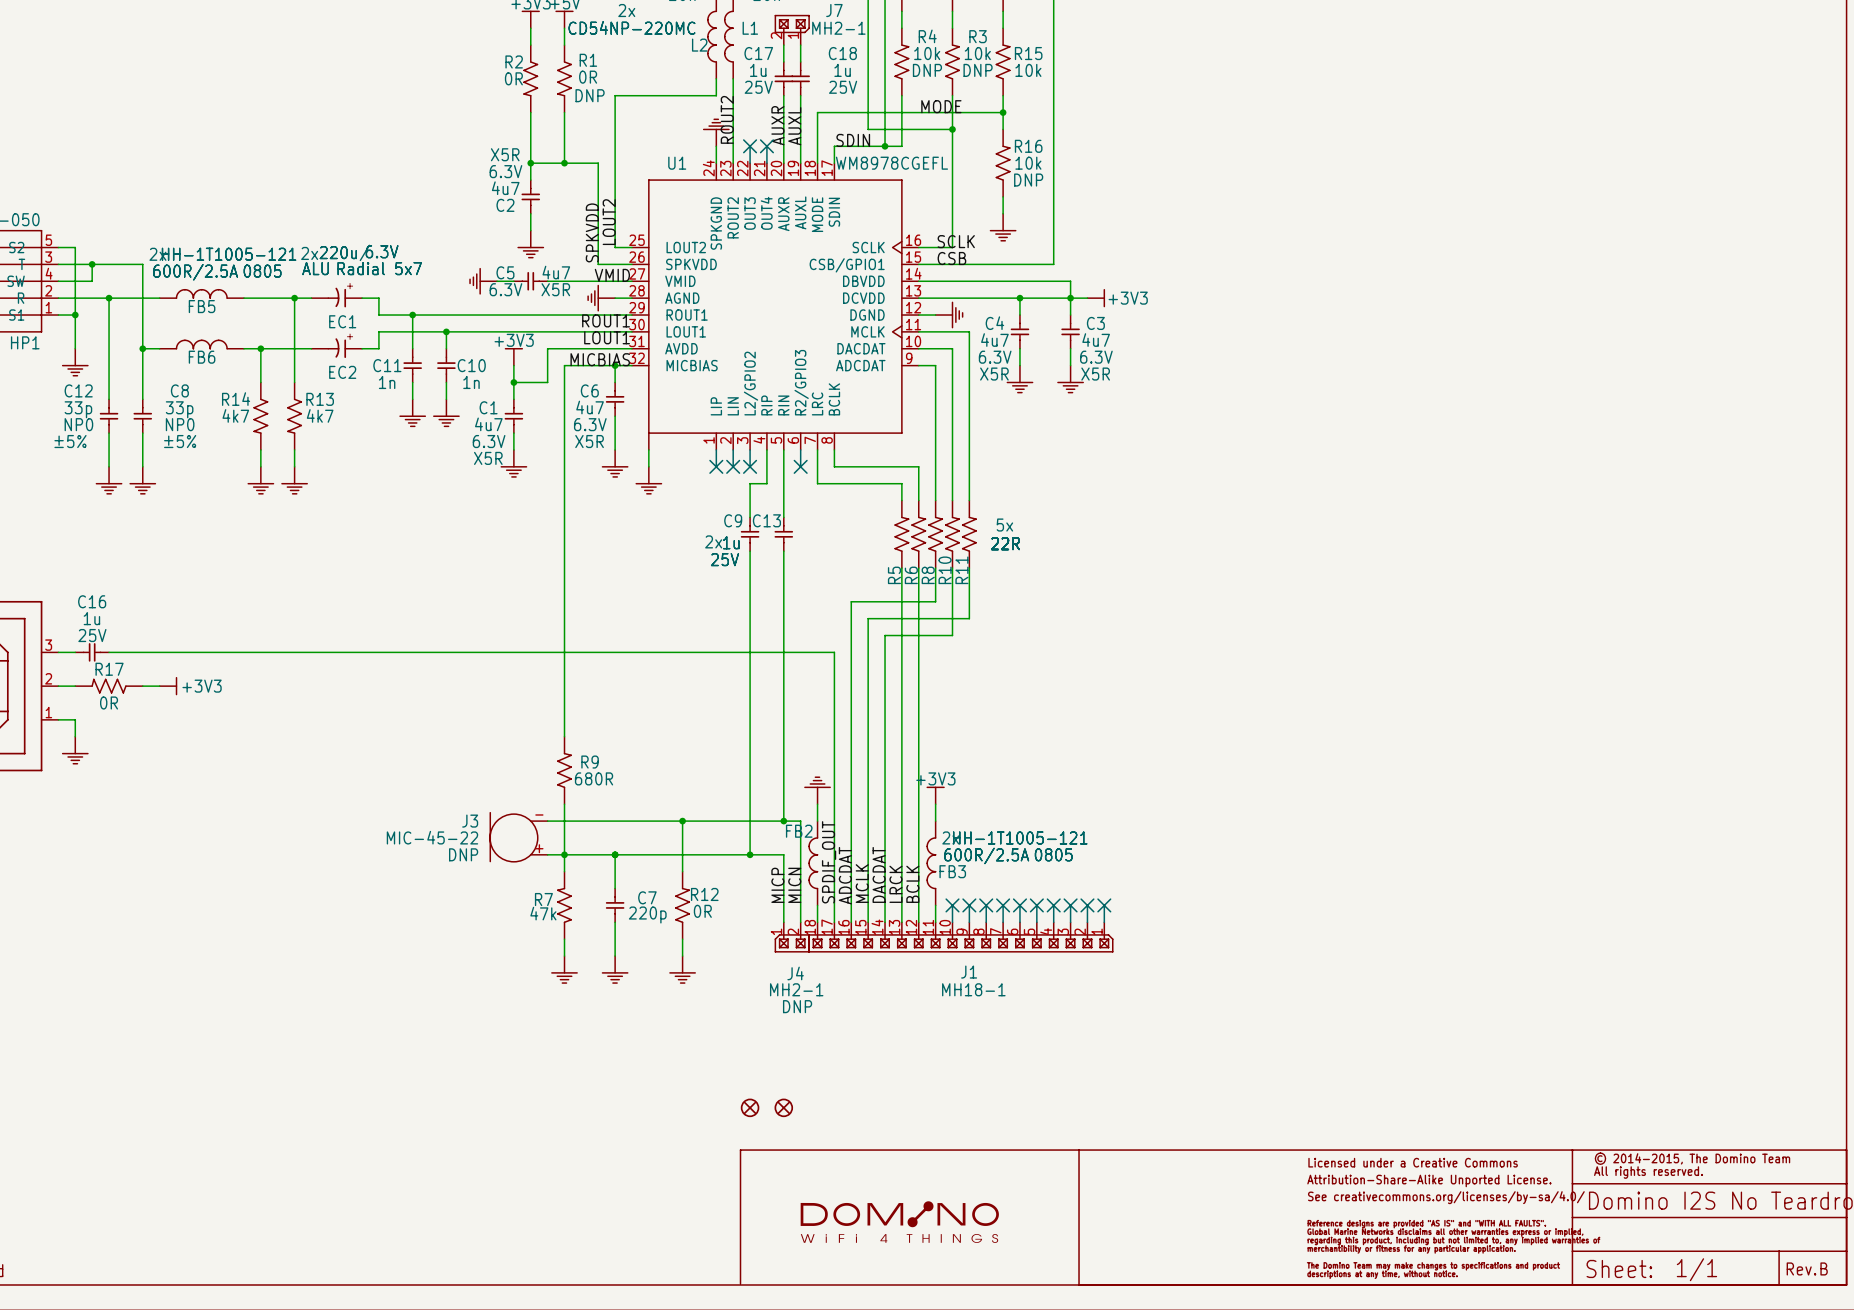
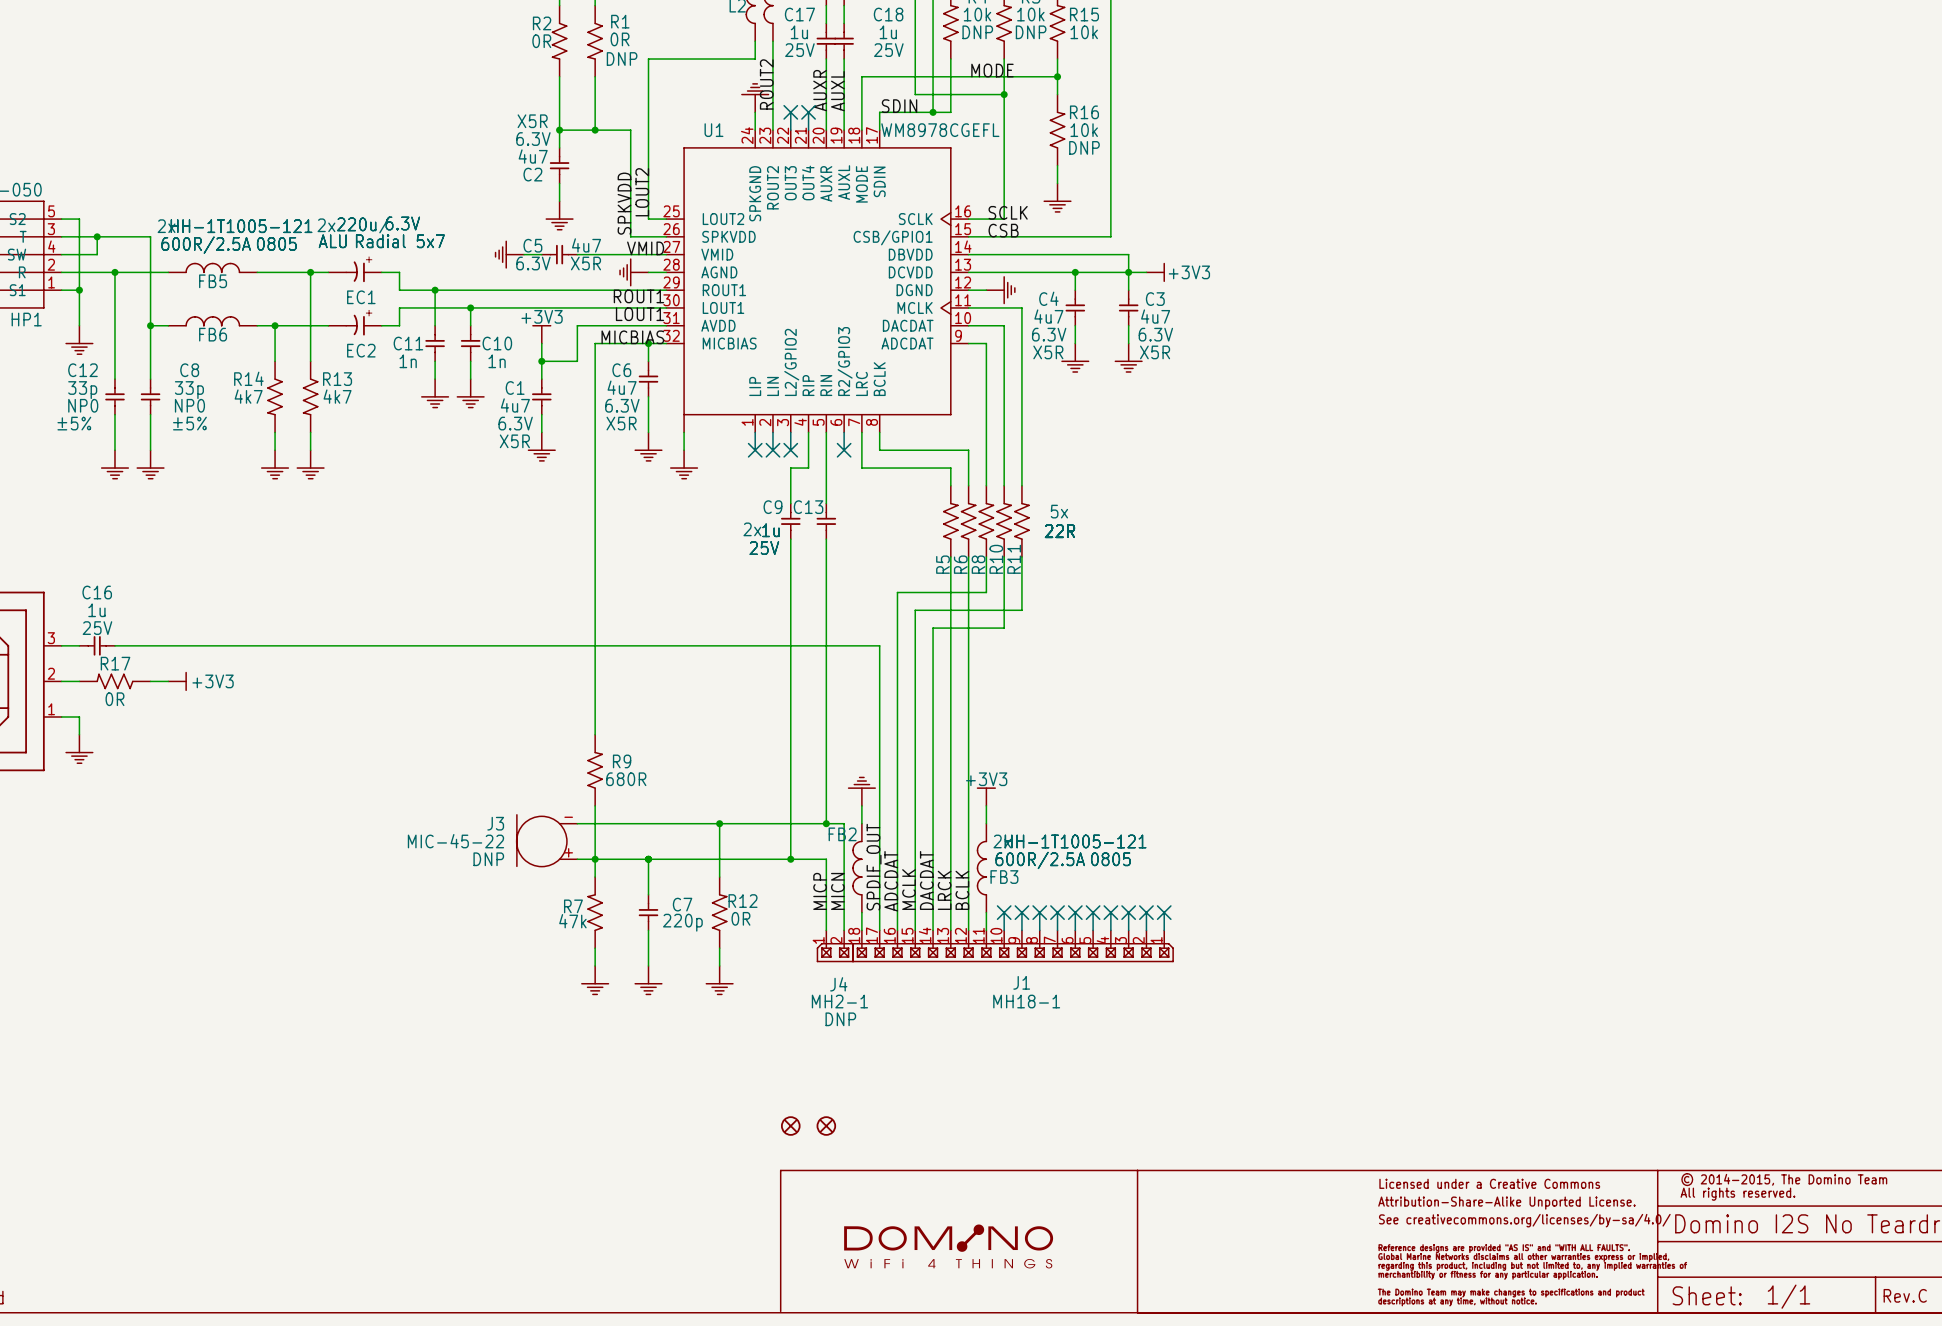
text: B (1824, 1268) -> C (1922, 1295)

